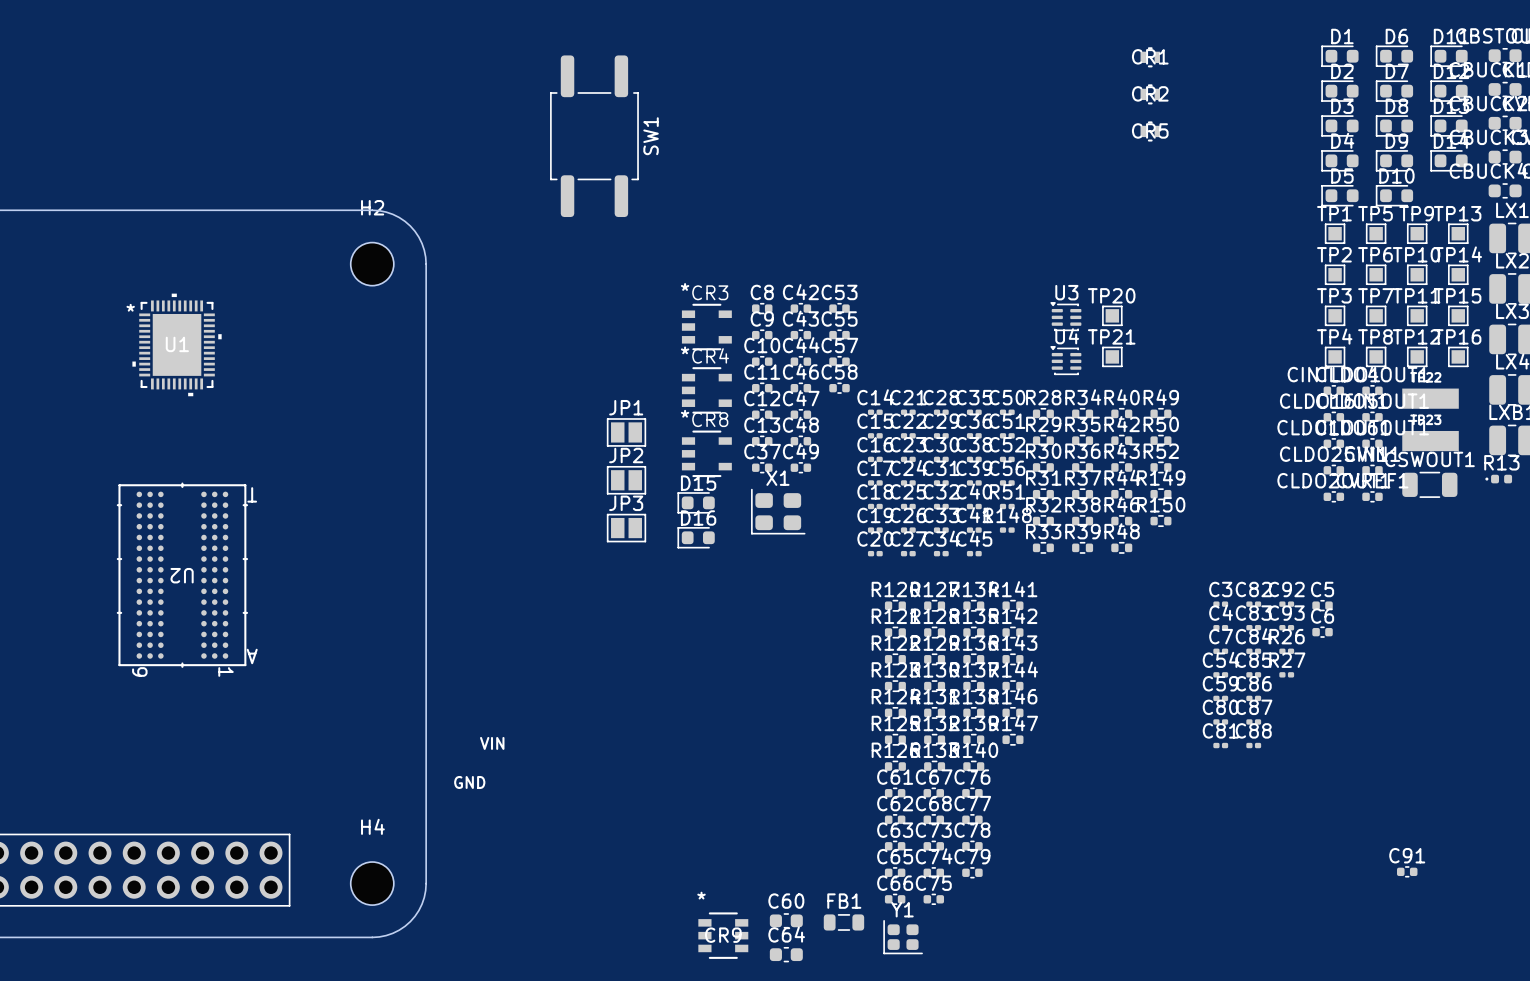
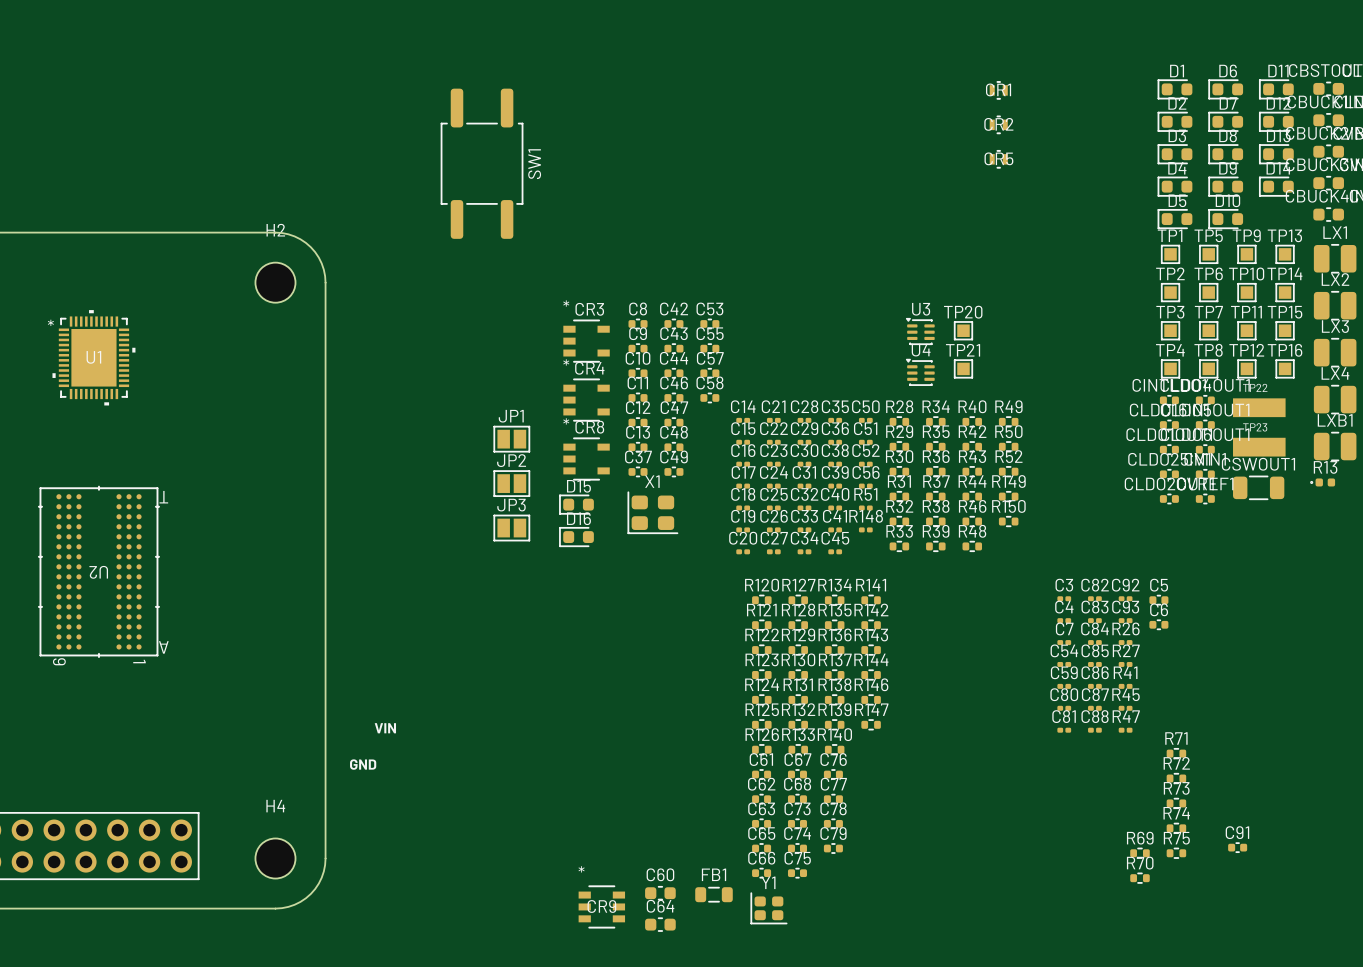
R41: none -> (1125, 686)
R45: none -> (1125, 708)
R47: none -> (1125, 730)
R71: none -> (1176, 753)
R72: none -> (1176, 778)
R73: none -> (1176, 803)
R74: none -> (1176, 828)
R69: none -> (1139, 853)
R75: none -> (1176, 853)
R70: none -> (1139, 878)

